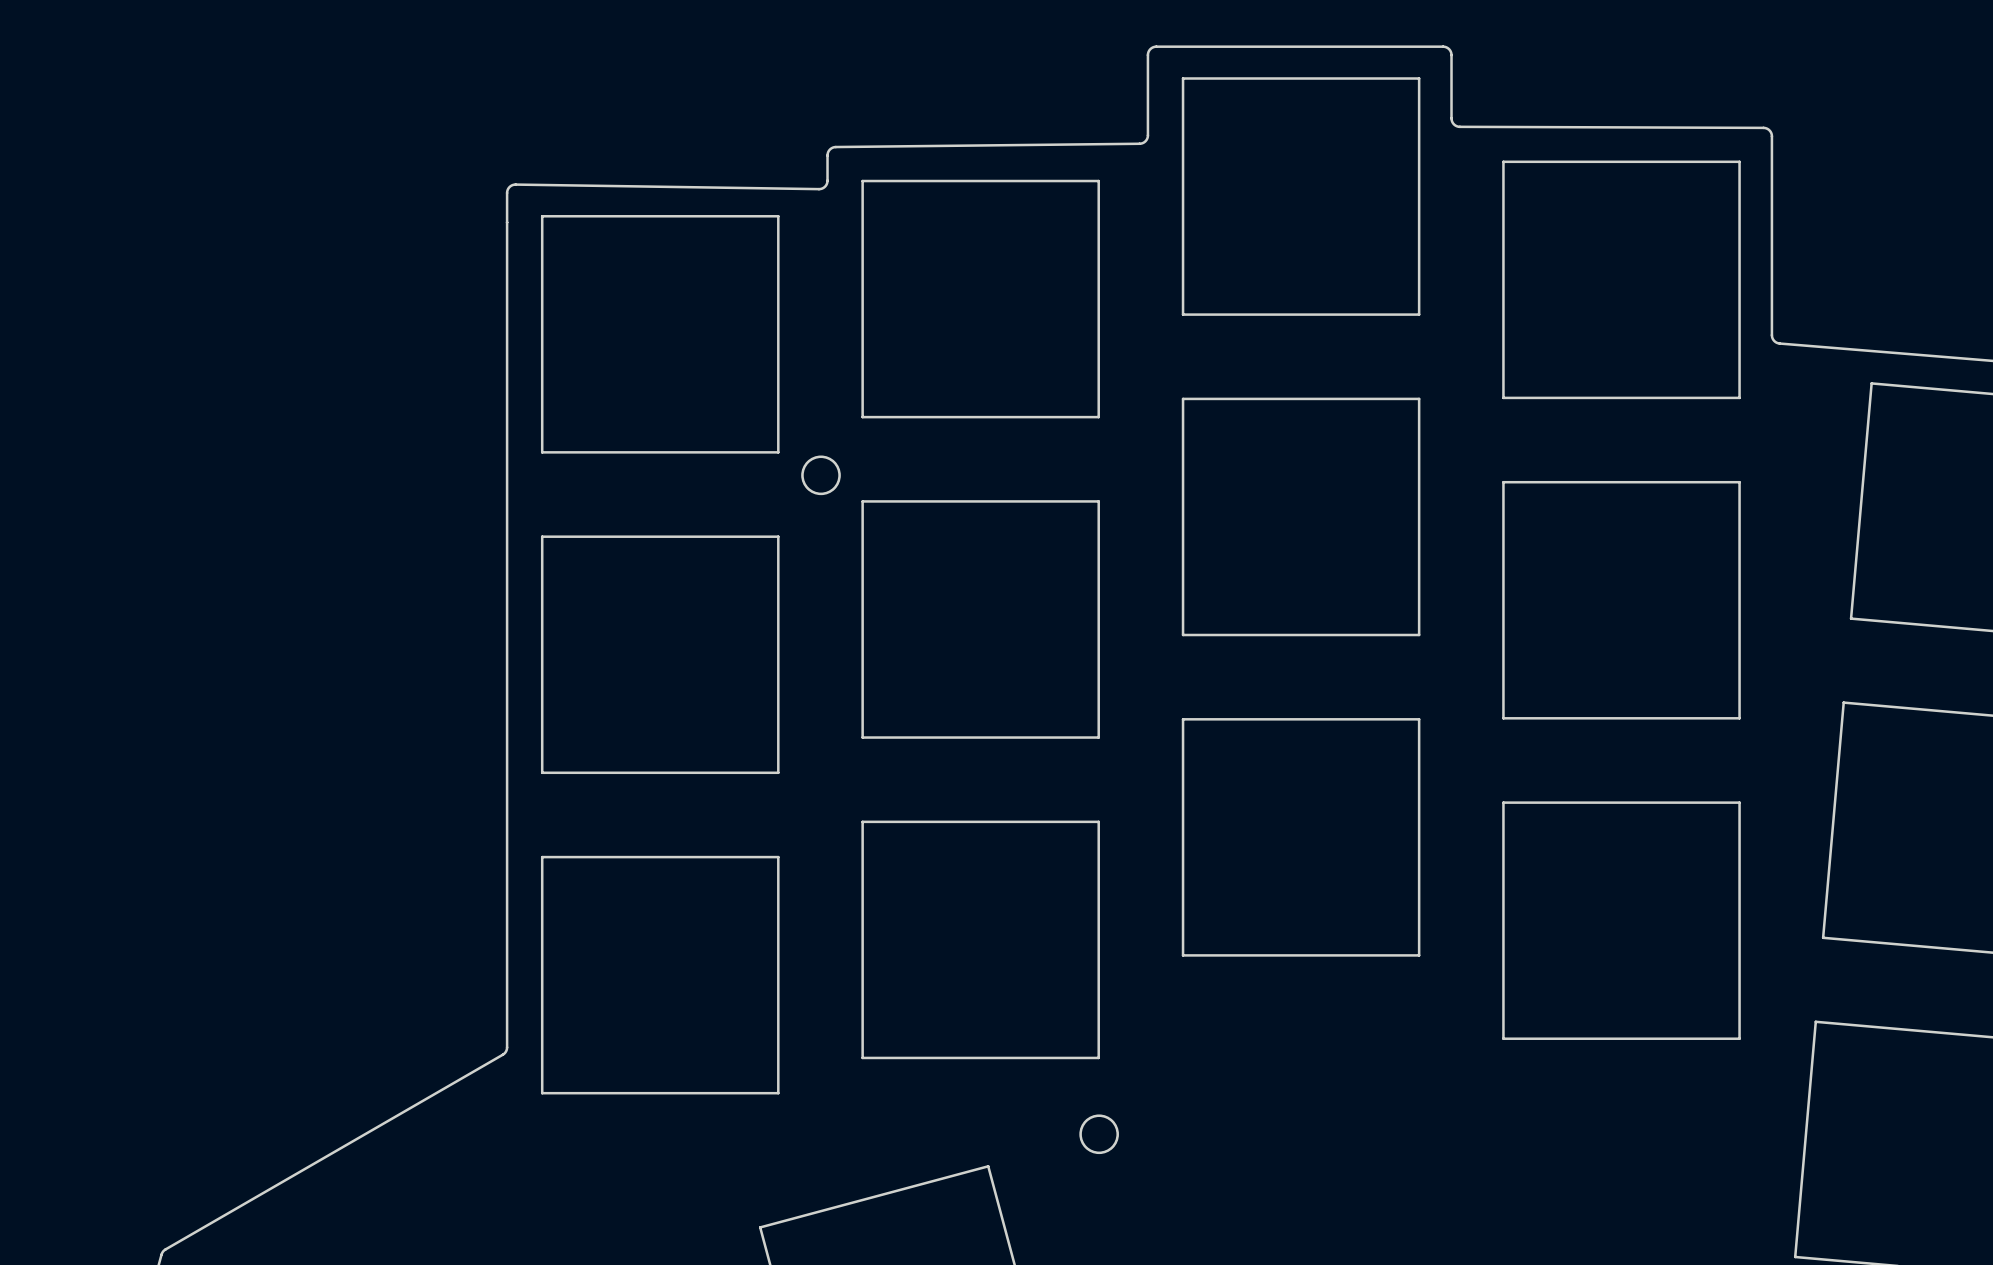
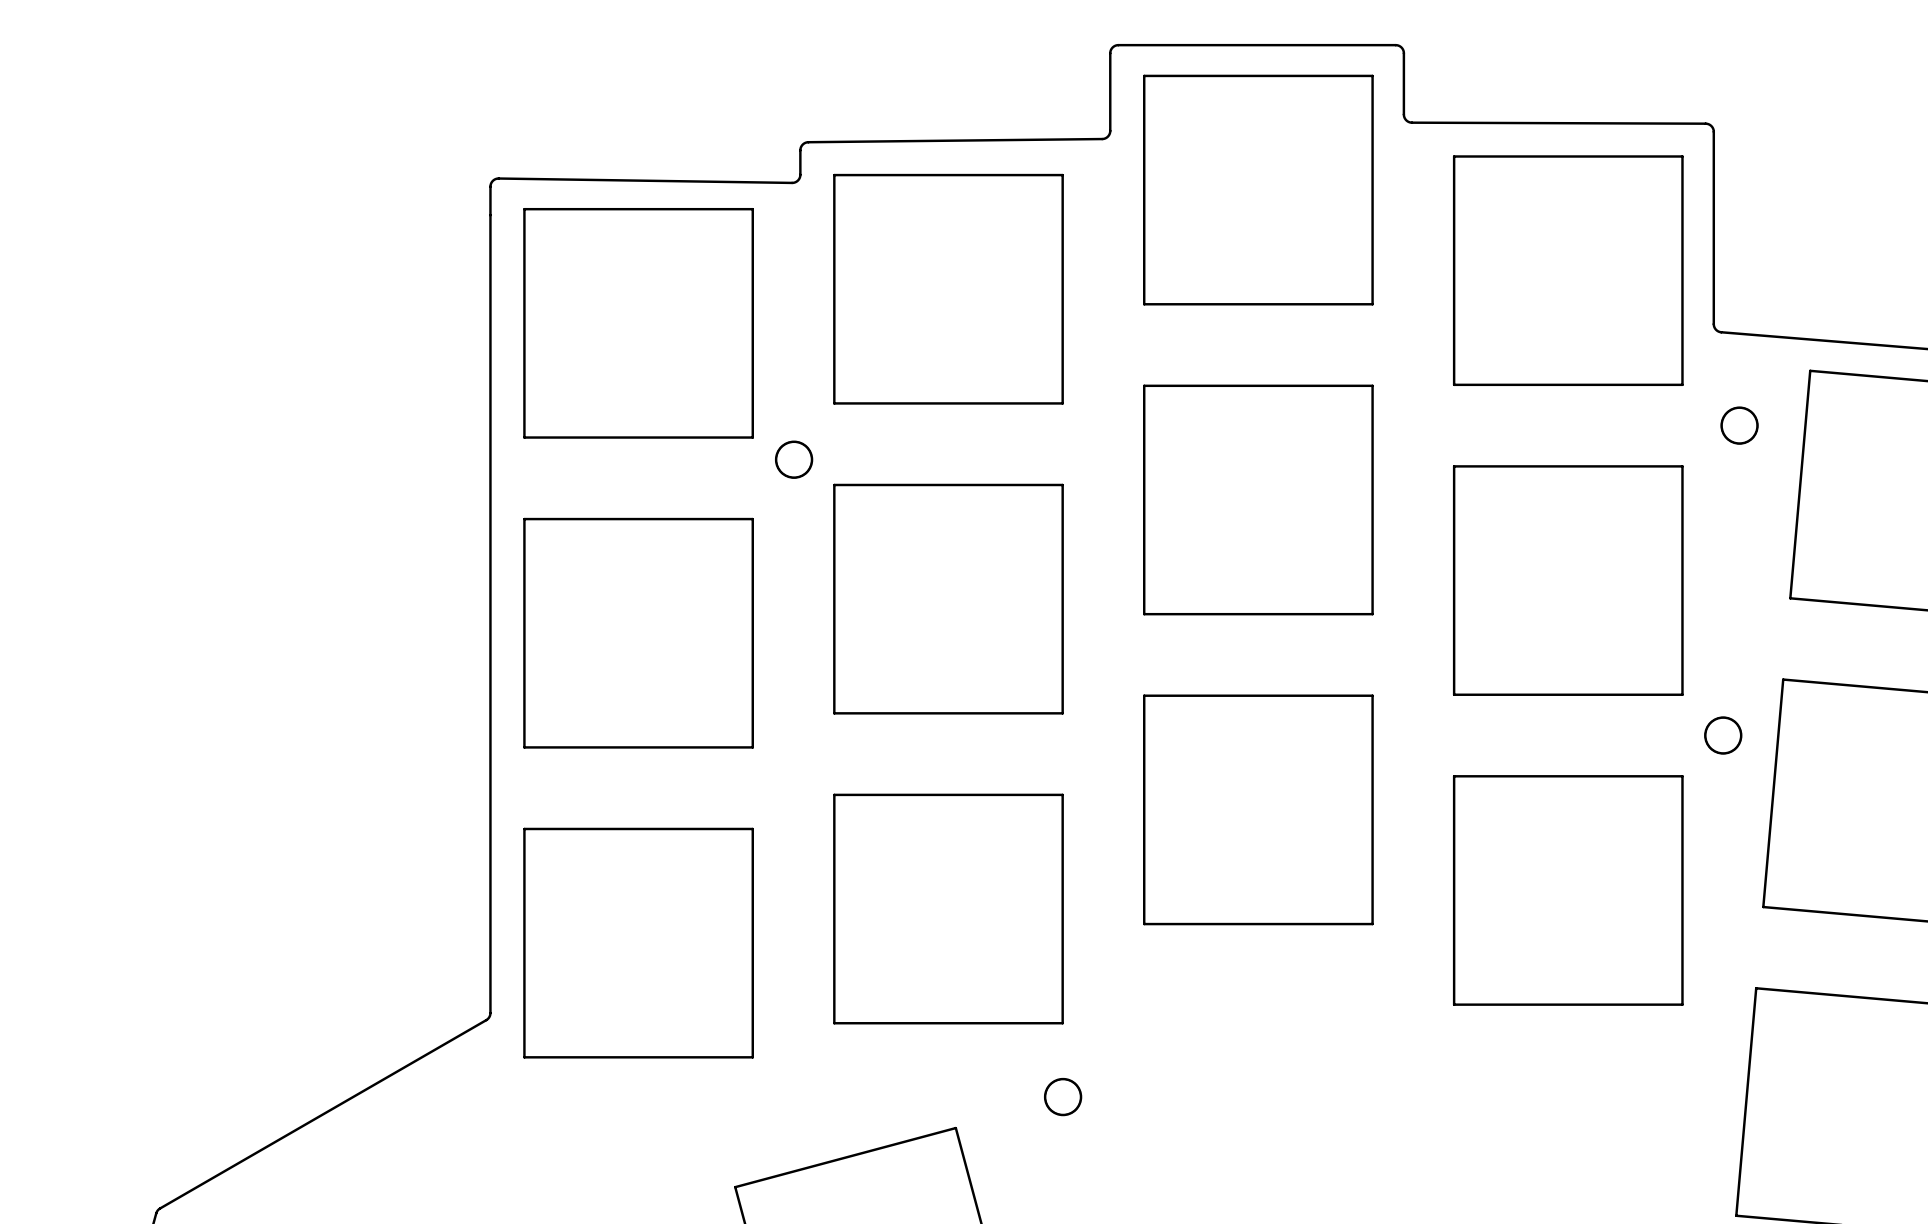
round board edge: none -> [1720, 406, 1759, 445]
round board edge: none -> [1704, 716, 1743, 755]

